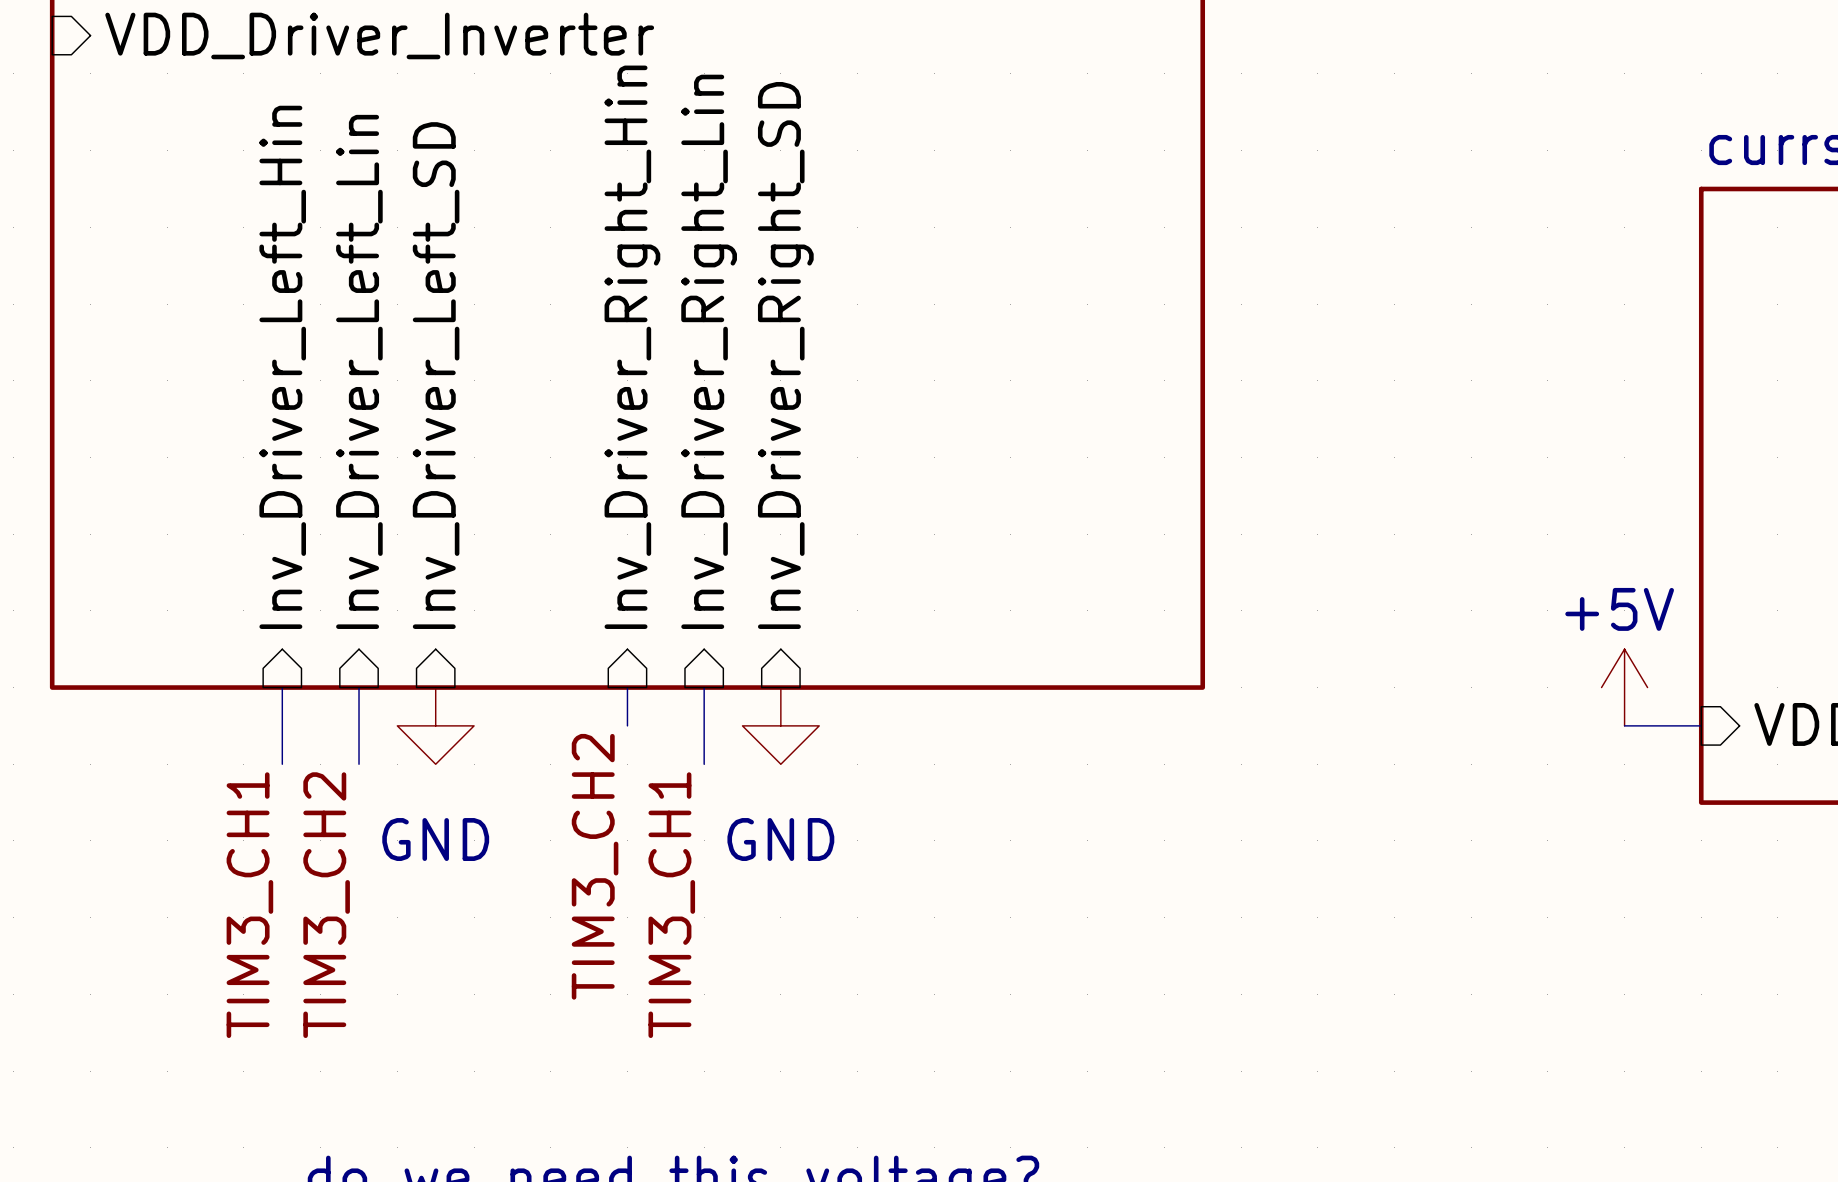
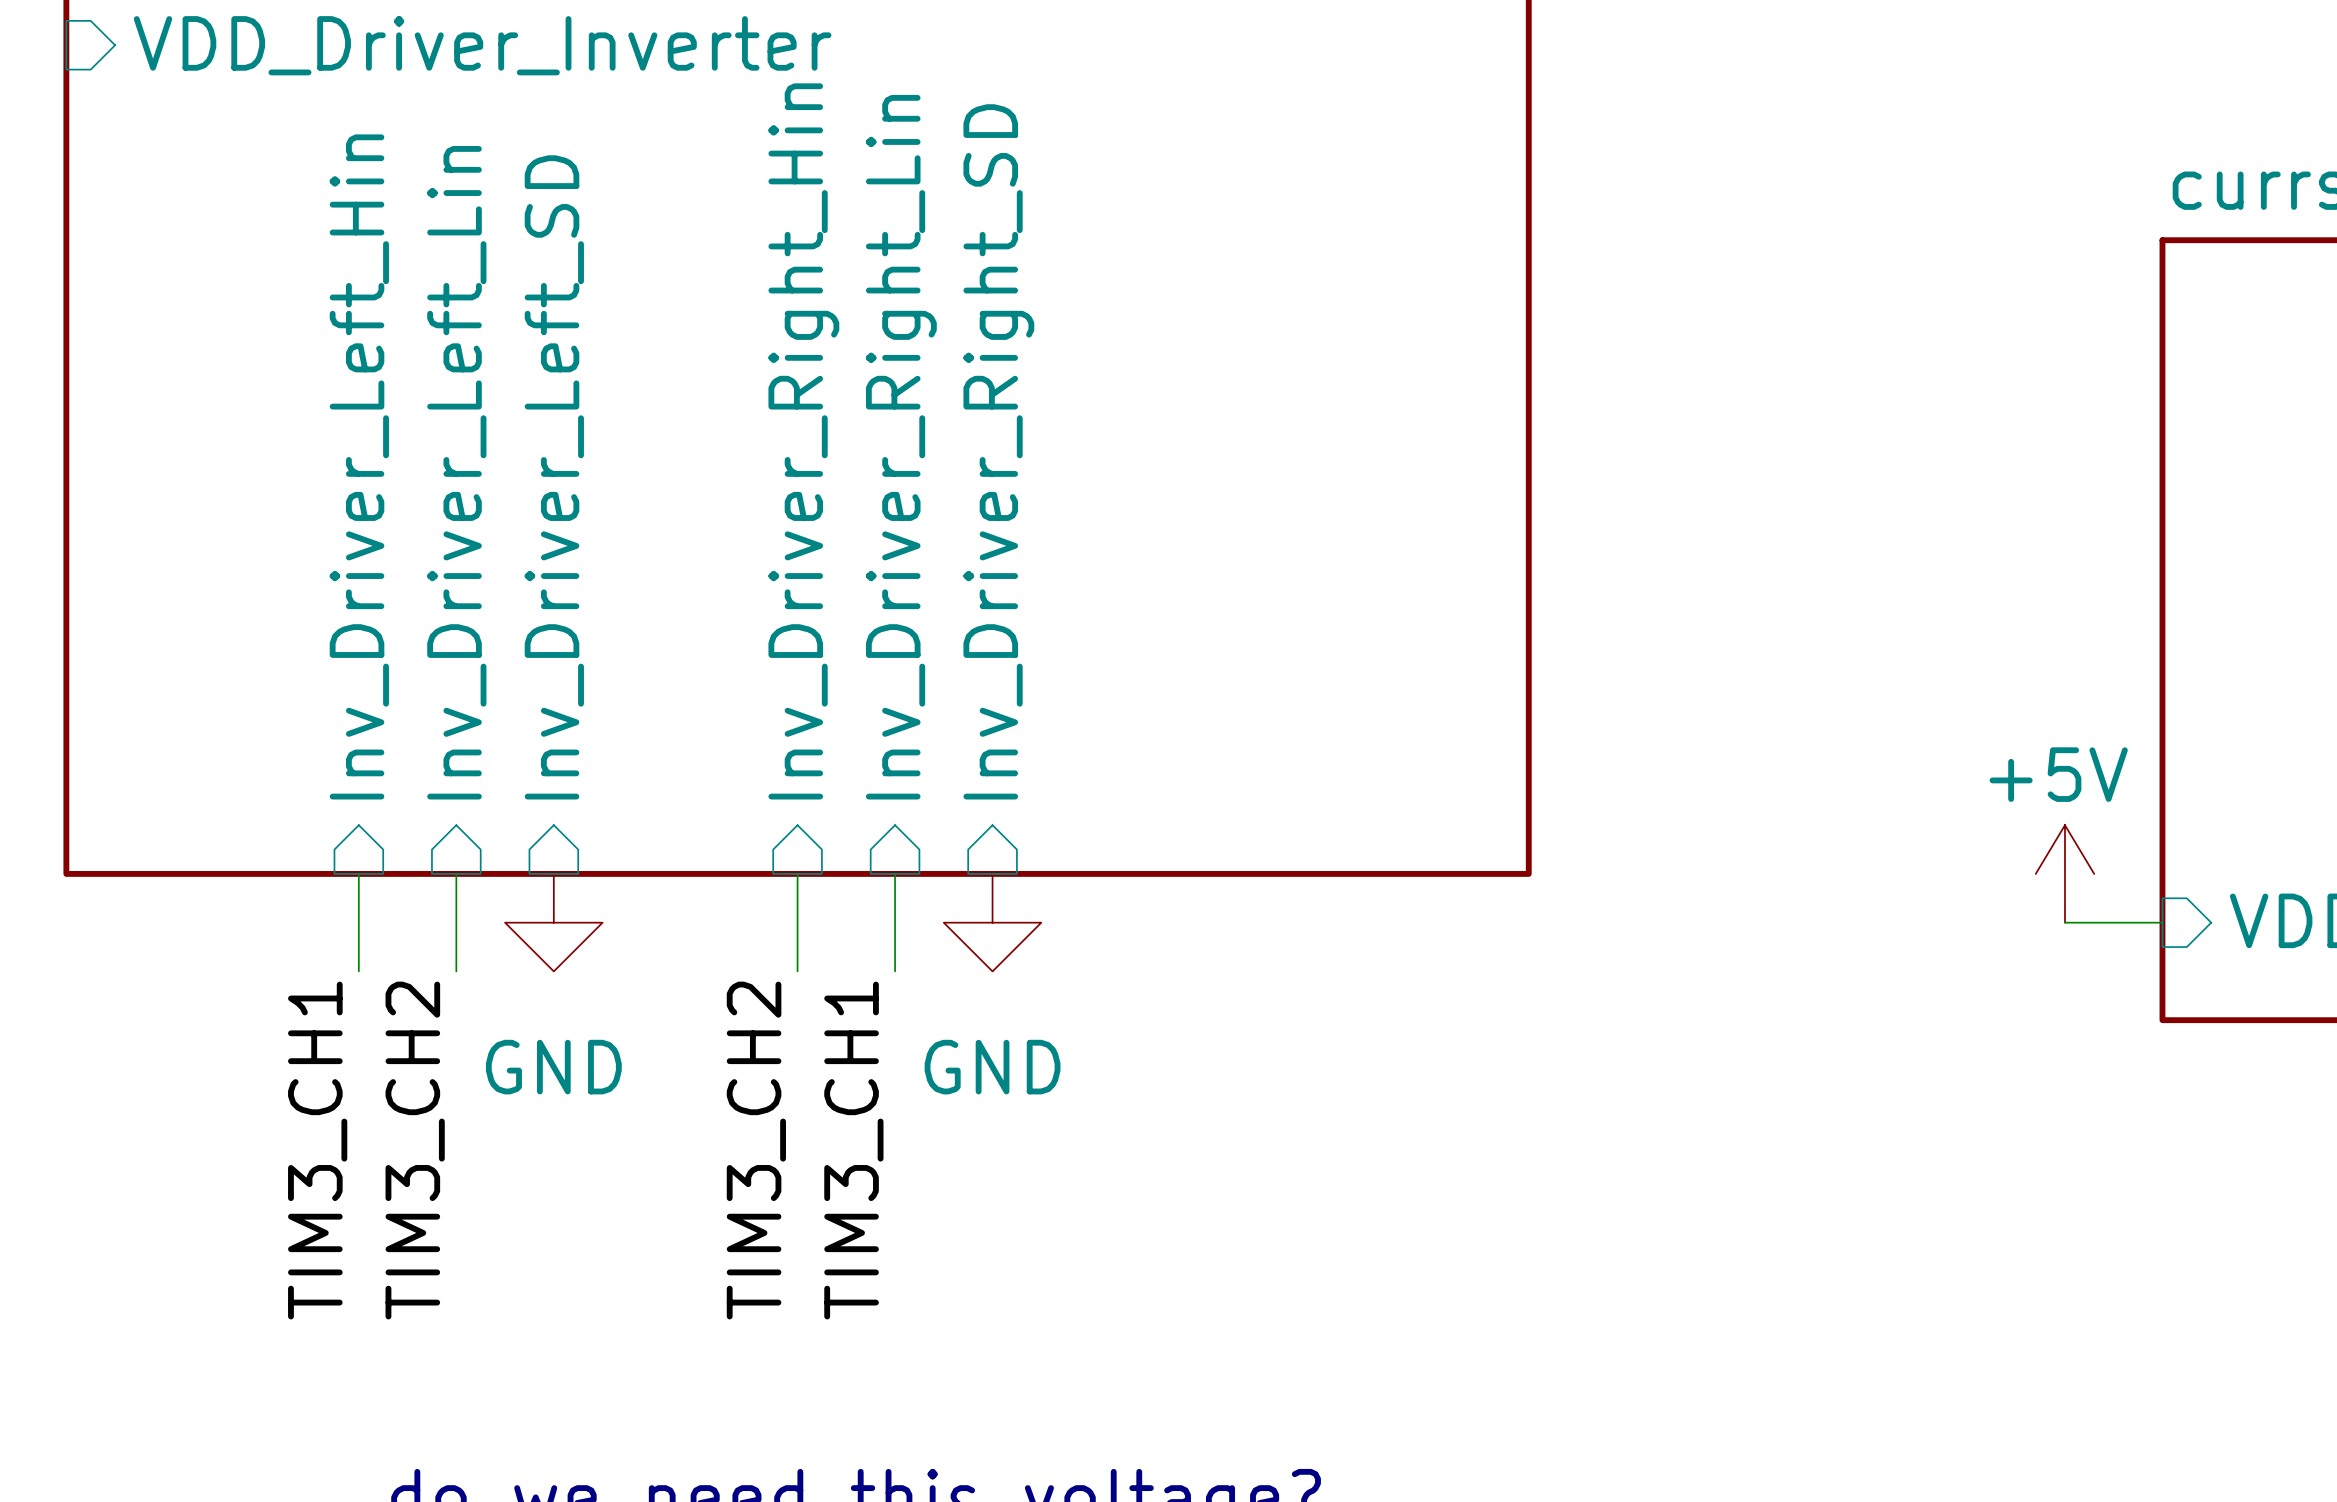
wire: none -> (797, 922) (797, 971)
label position: TIM3_CH2 (595, 866) -> TIM3_CH2 (756, 1150)

